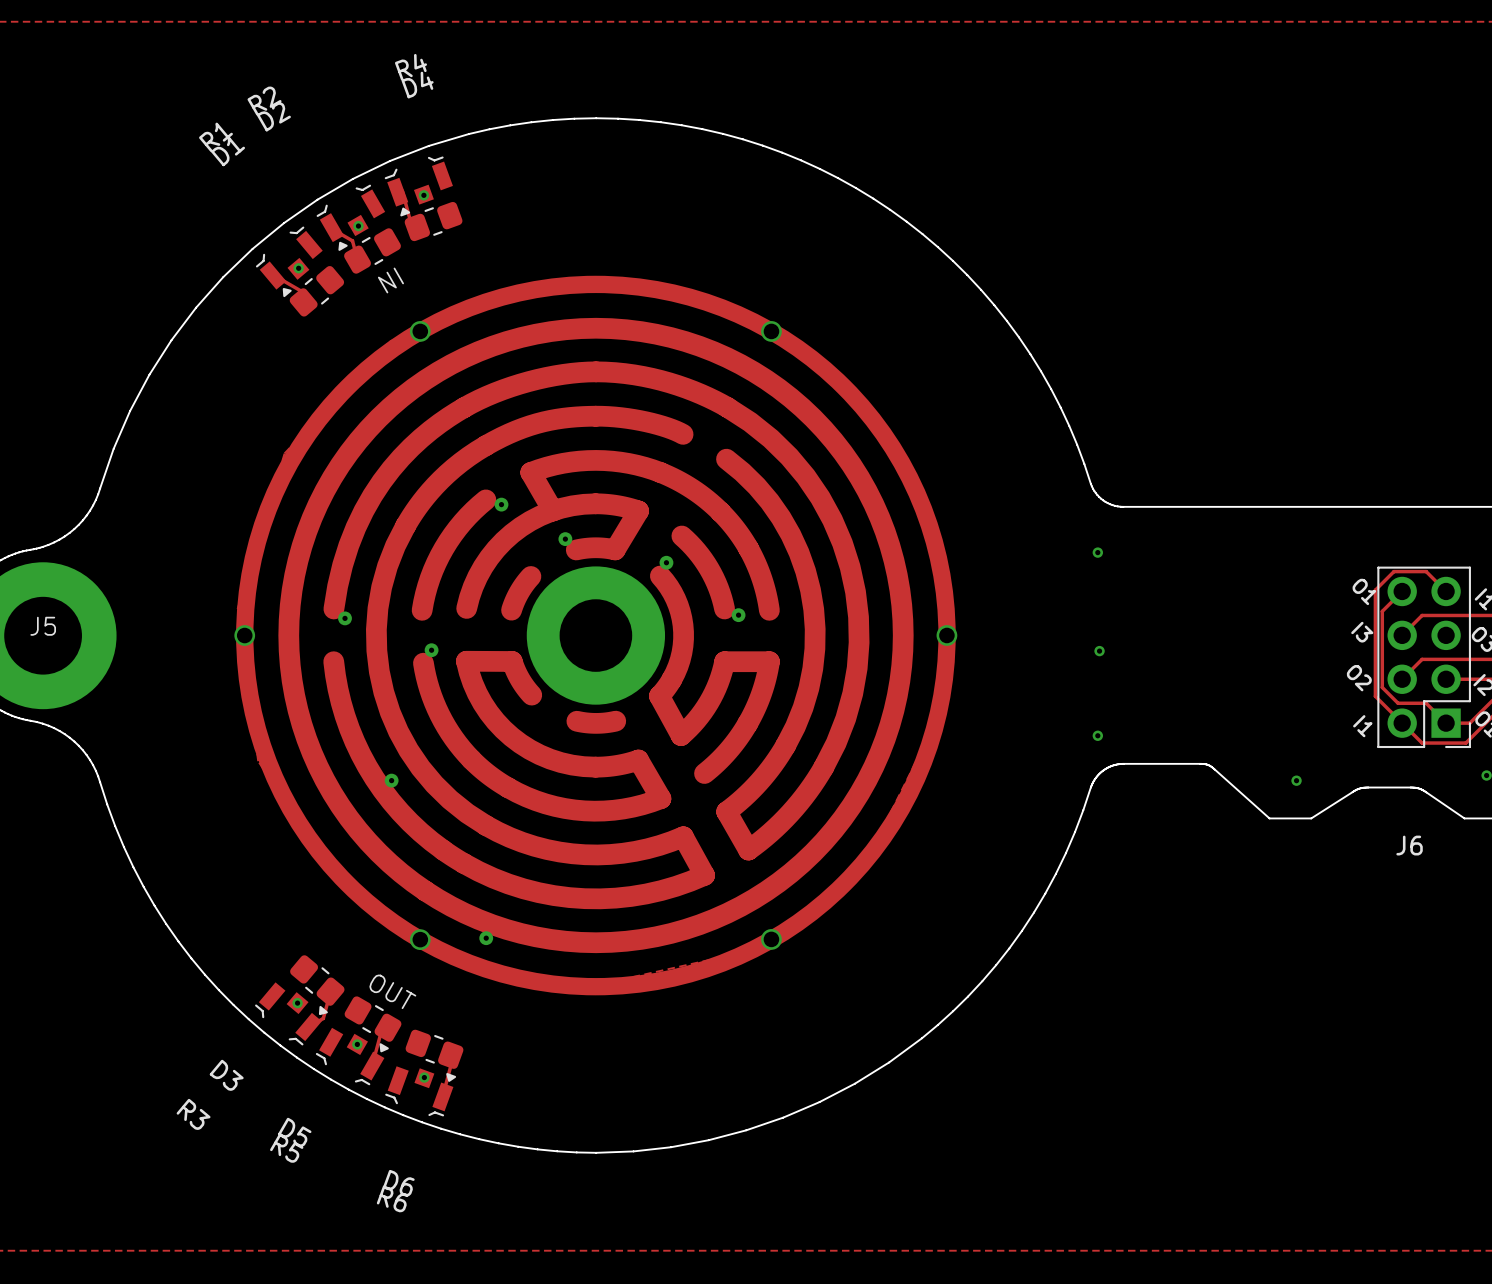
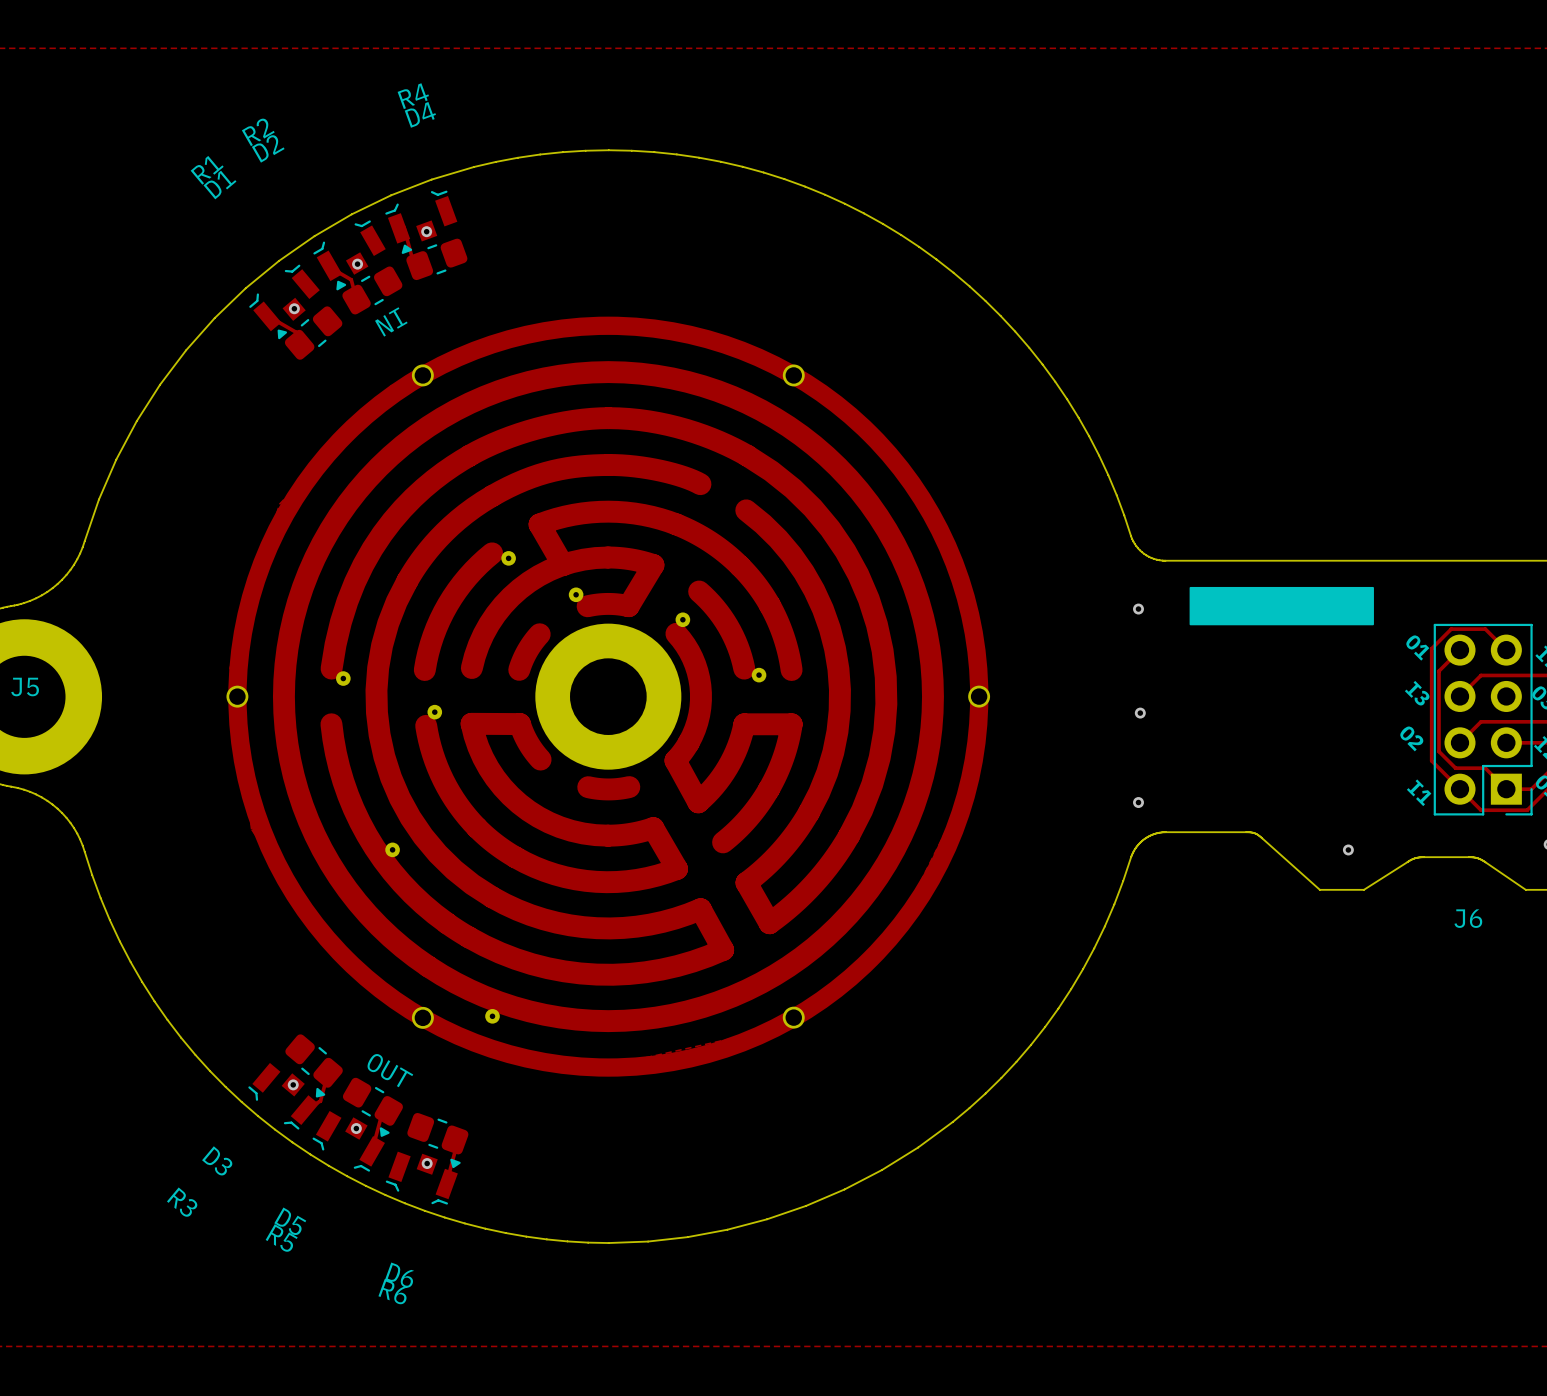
drawing: none -> [1189, 586, 1374, 626]

